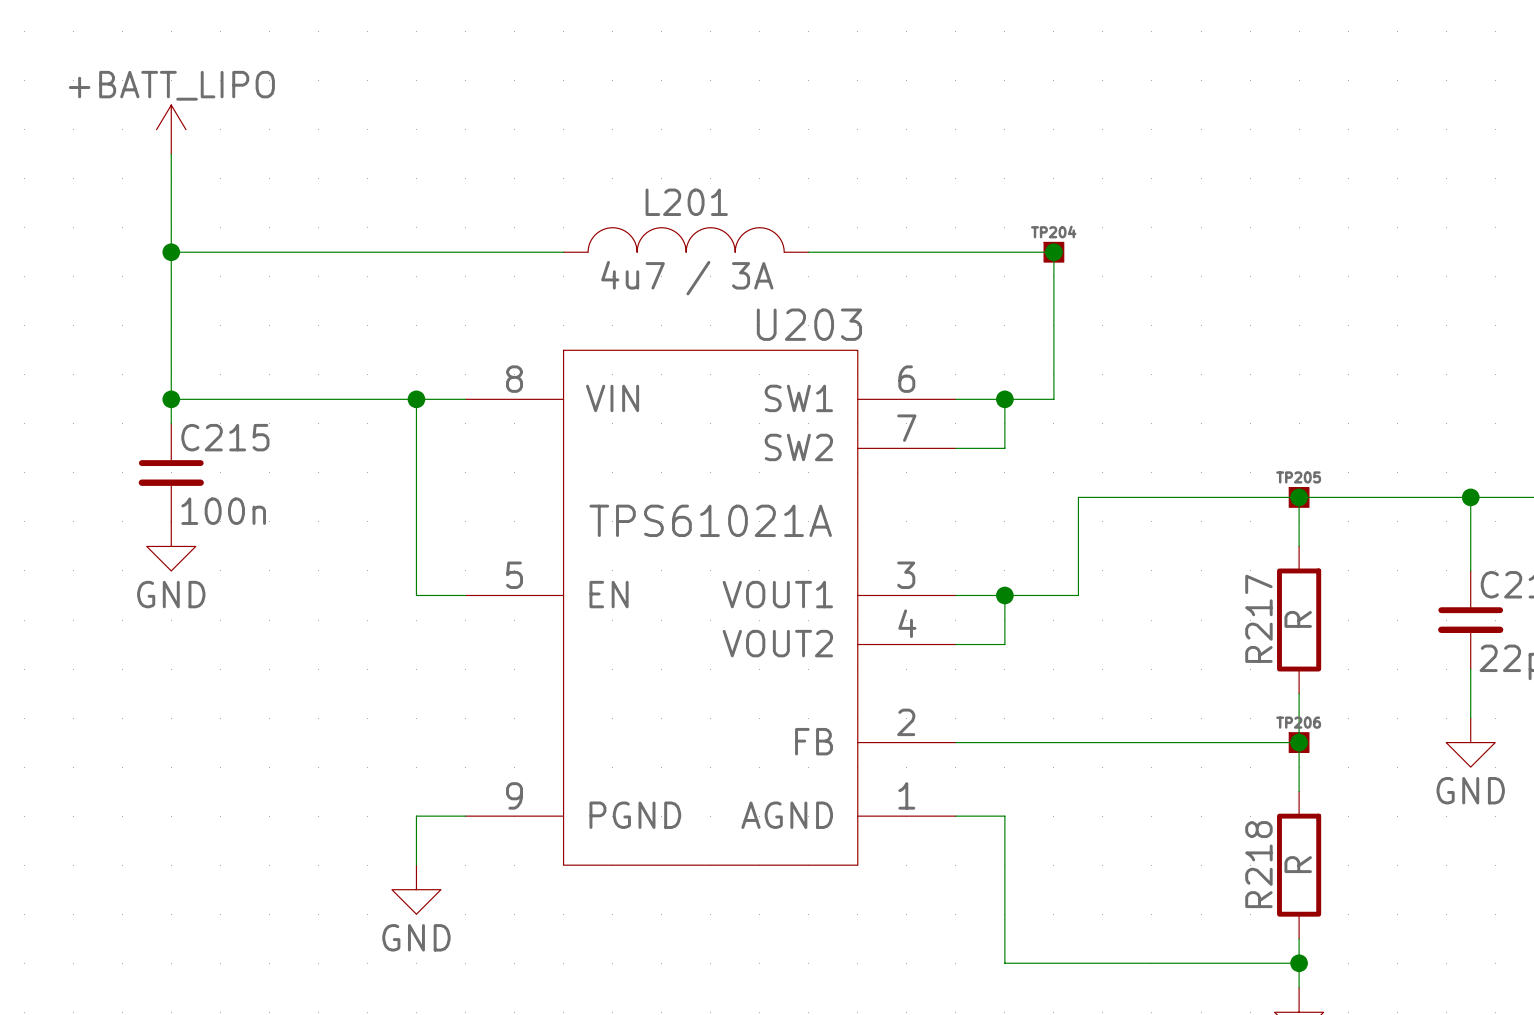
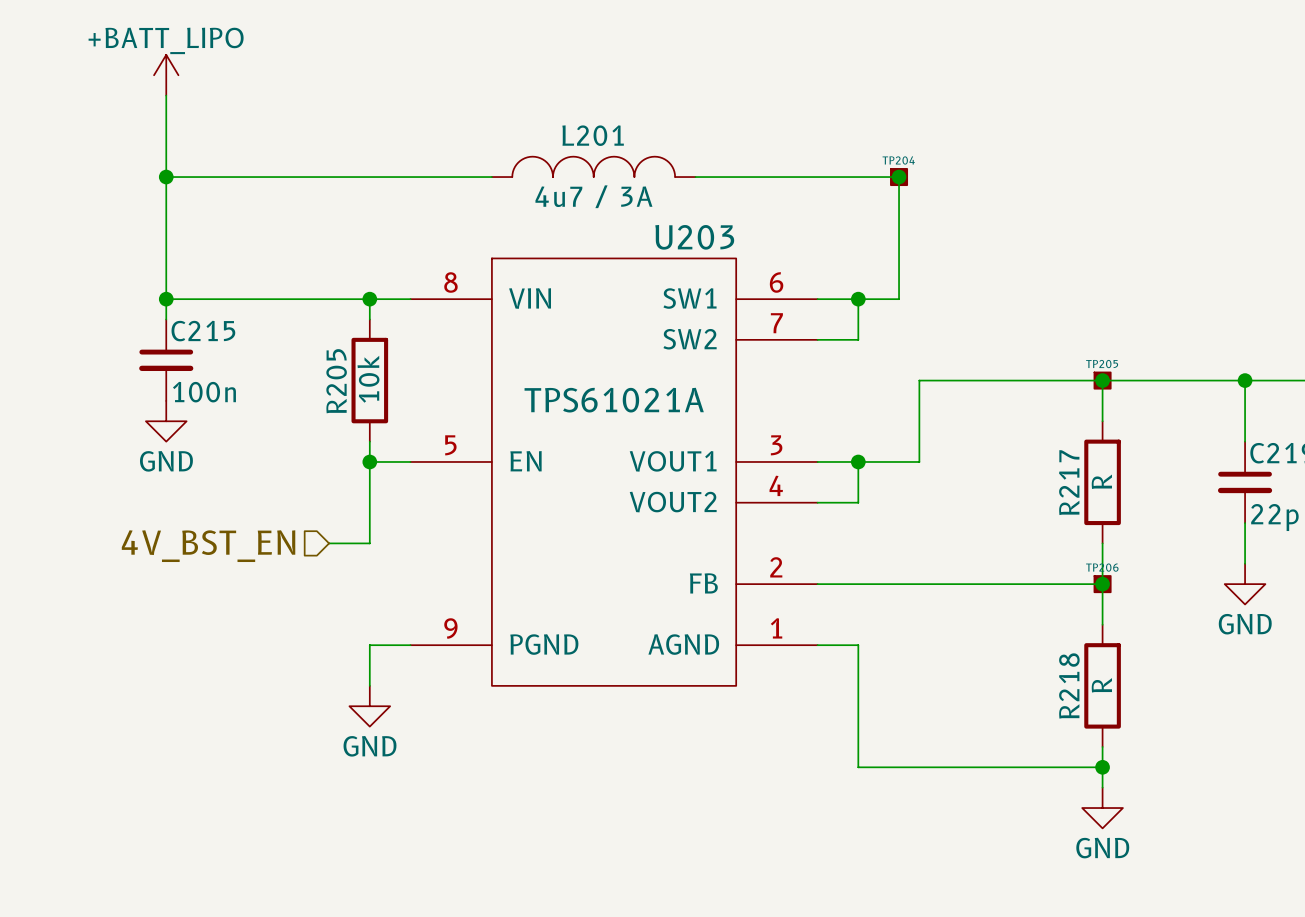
wire: (416, 423) (416, 570) -> none
R205: none -> 10k (369, 380)
wire: none -> (369, 461) (369, 543) (329, 543)
junction: none -> (369, 461)
hierarchical label: none -> 4V_BST_EN (208, 546)

